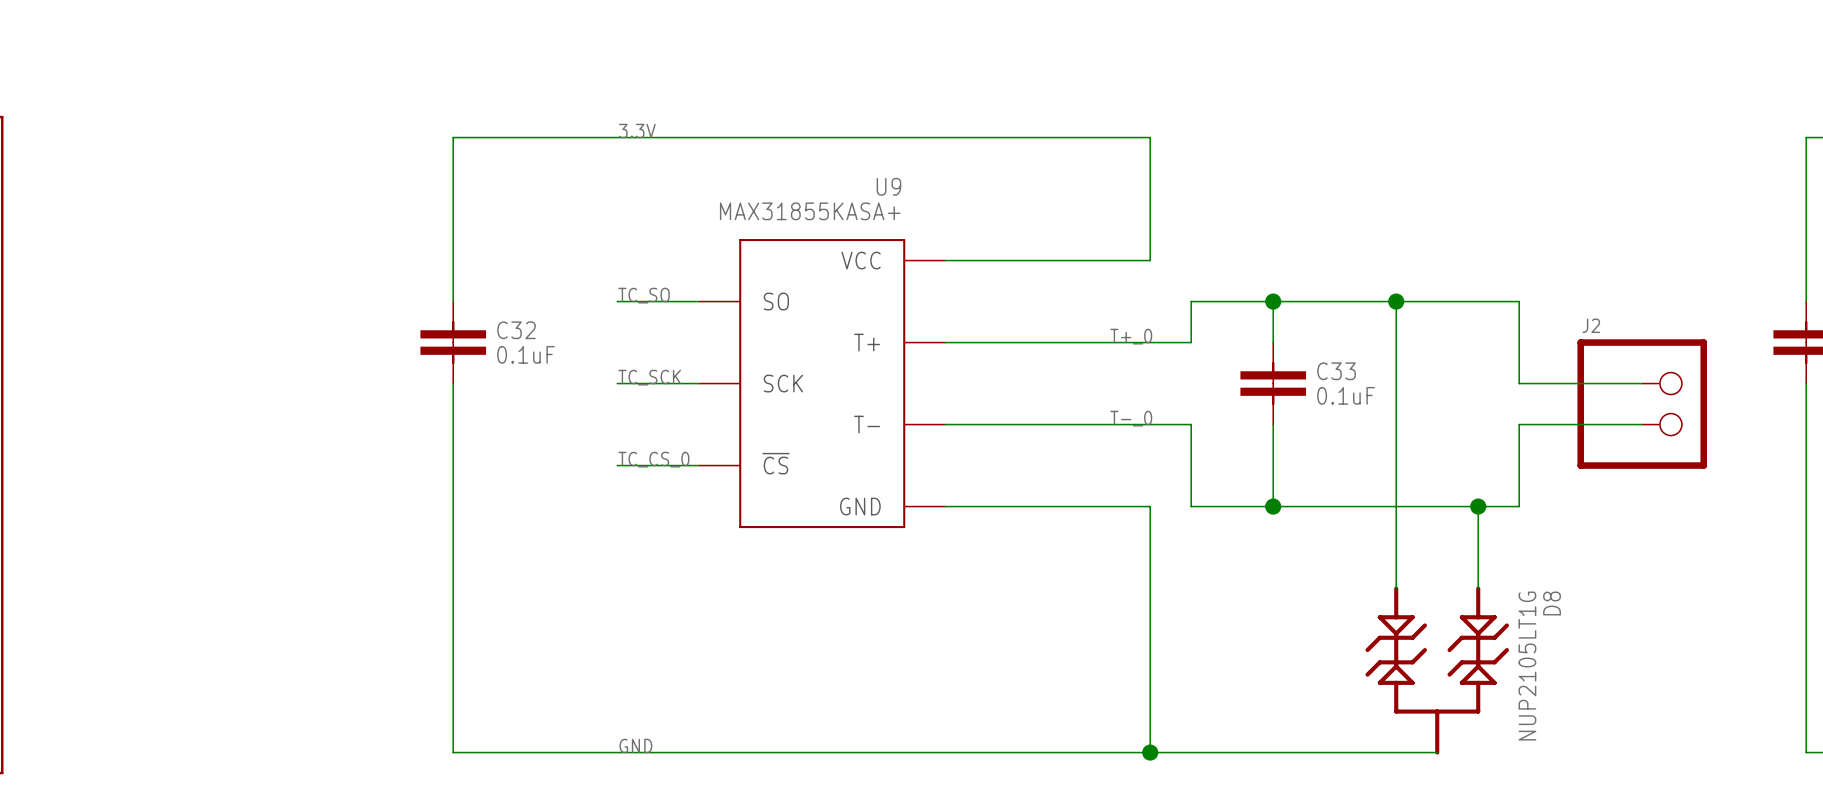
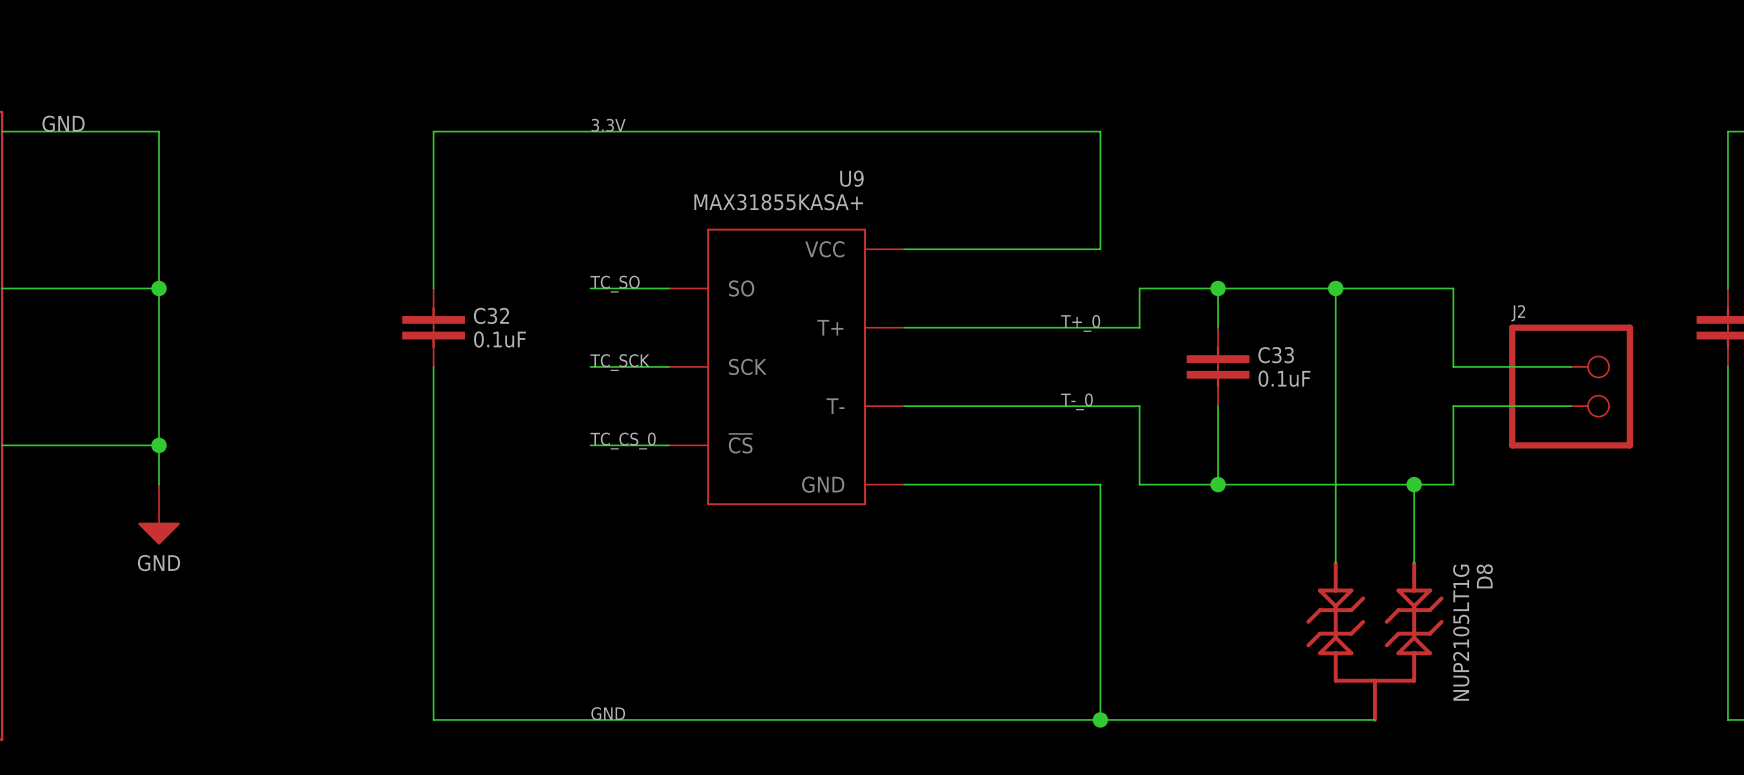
label: none -> GND (63, 123)
wire: none -> (2, 131) (159, 131) (159, 484)
wire: none -> (2, 288) (159, 288)
junction: none -> (159, 288)
wire: none -> (2, 445) (159, 445)
junction: none -> (159, 445)
power symbol: none -> GND (159, 514)

